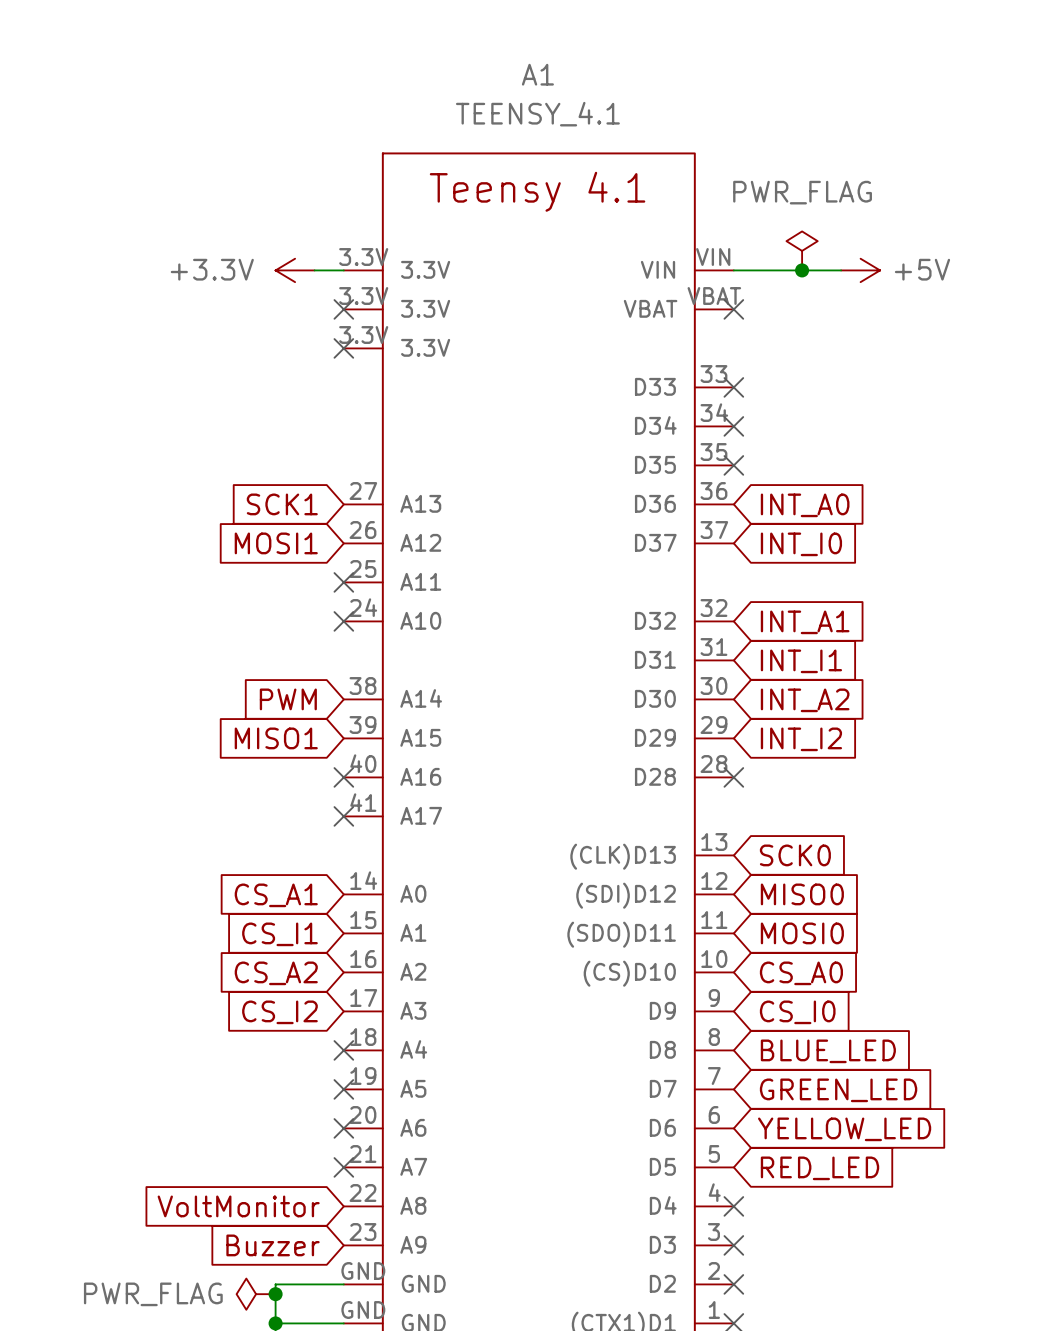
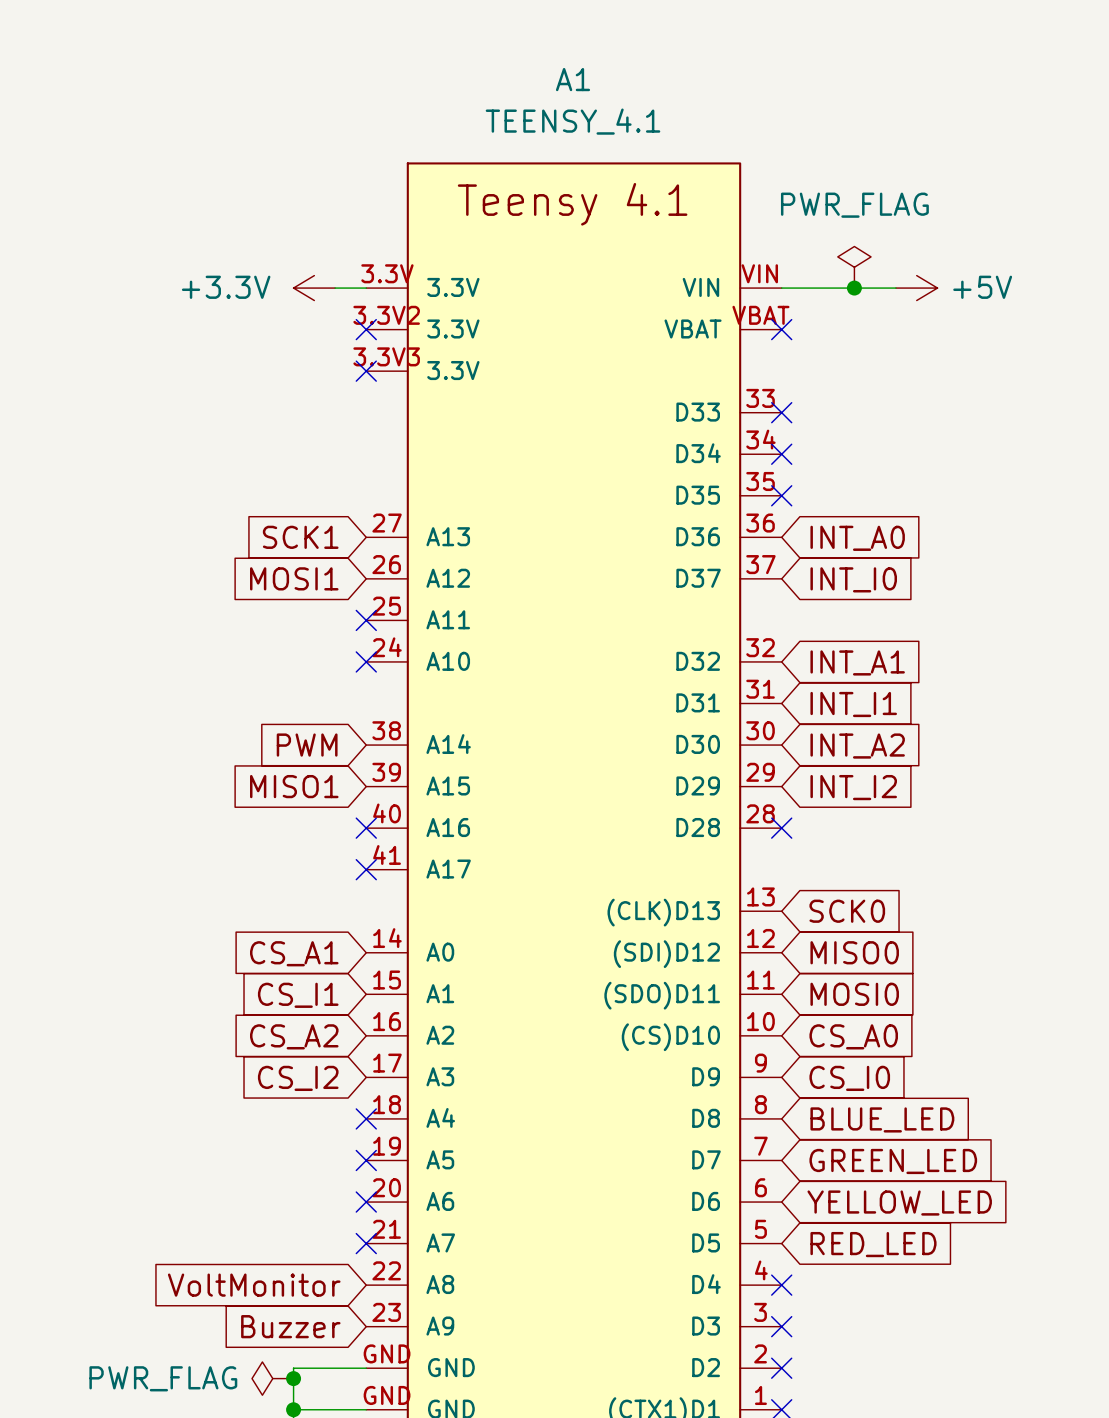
A1 pin number: 3.3V (363, 296) -> 3.3V2 (386, 315)
A1 pin number: 3.3V (363, 335) -> 3.3V3 (386, 356)

